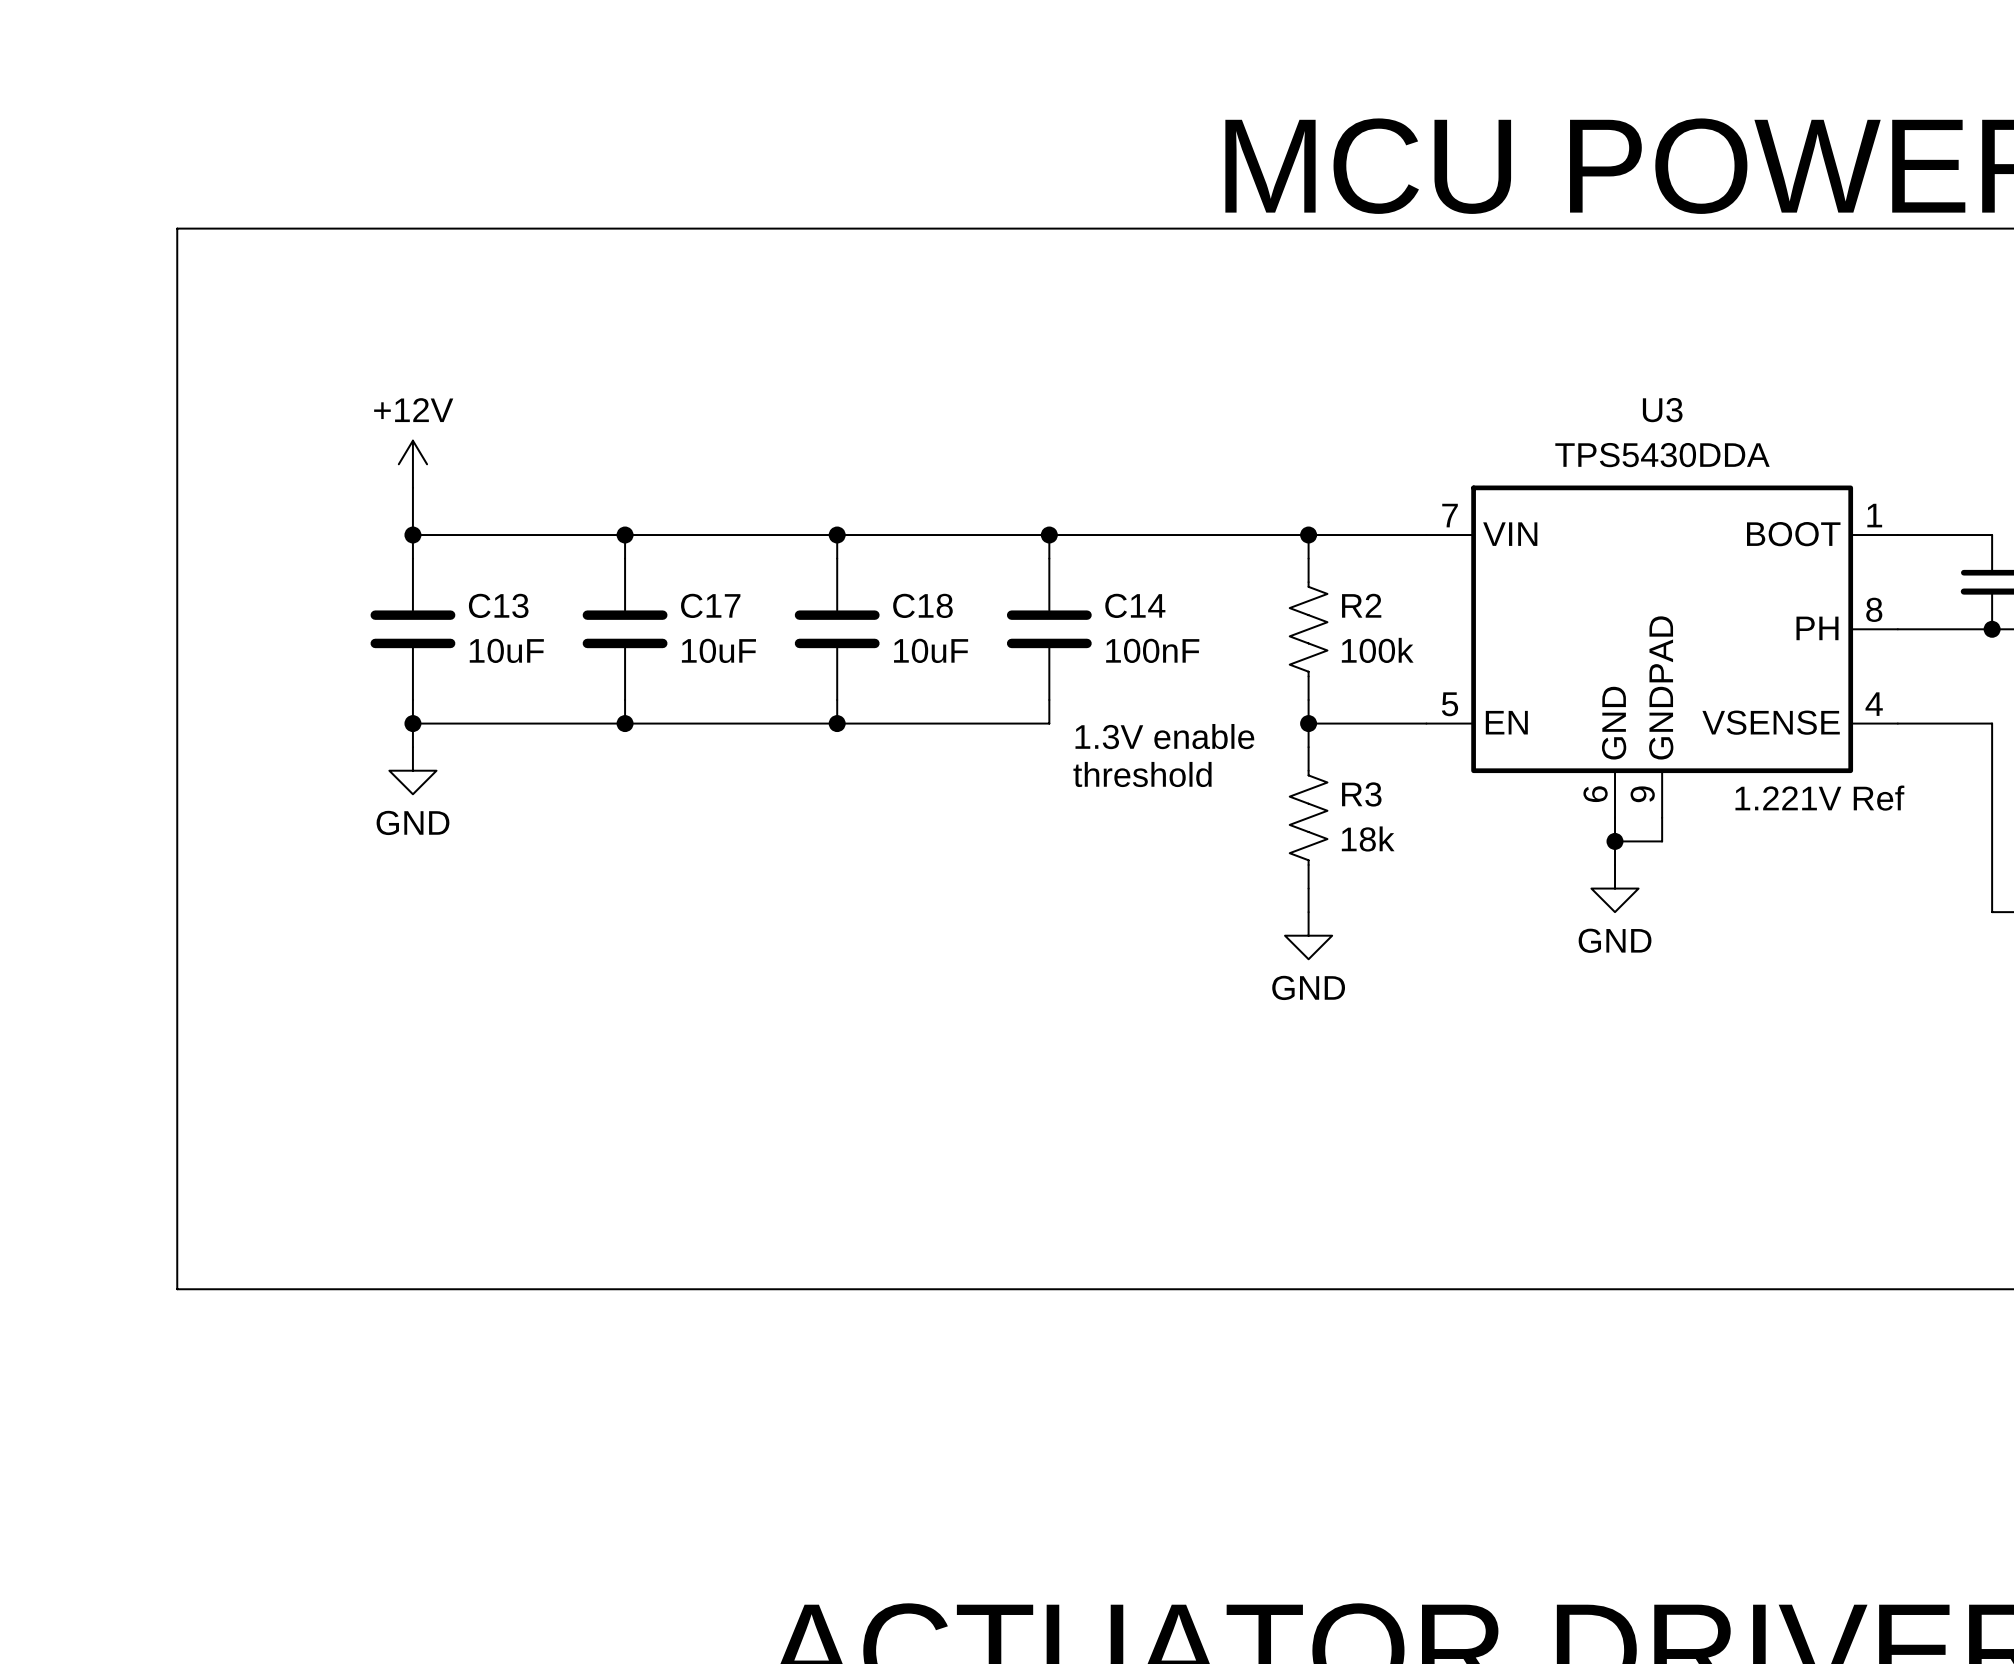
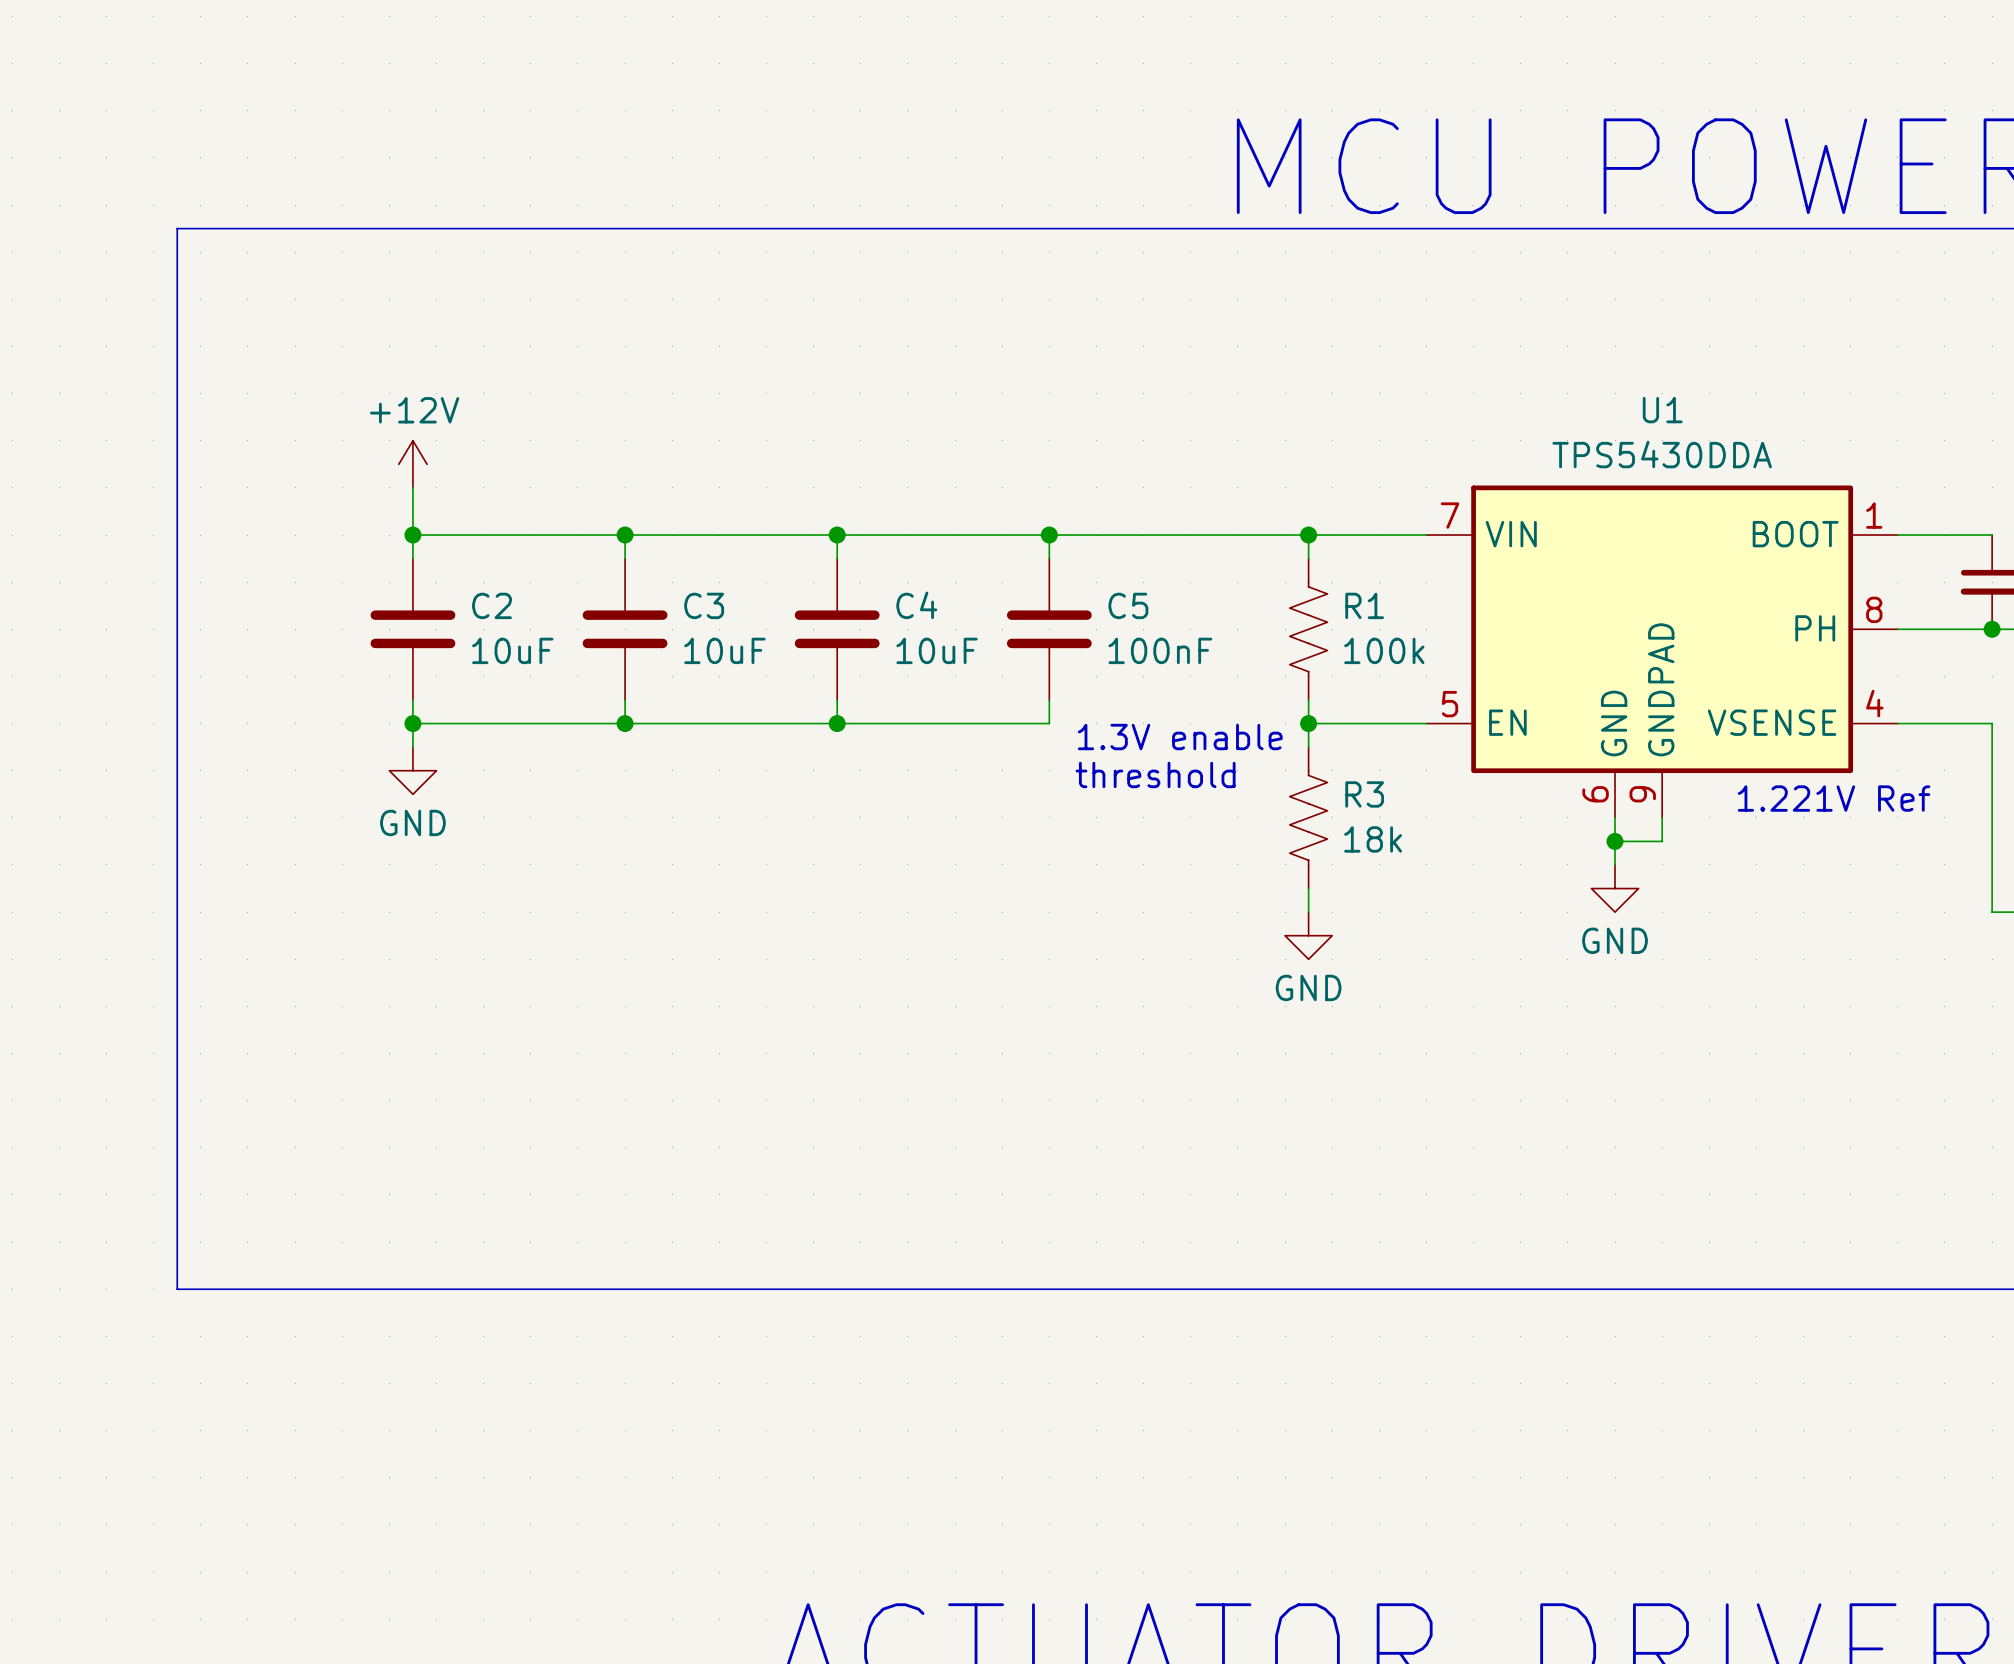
U3 name: U3 (1662, 410) -> U1 (1662, 410)
C13 name: C13 (498, 605) -> C2 (492, 605)
C17 name: C17 (710, 605) -> C3 (704, 605)
C18 name: C18 (922, 605) -> C4 (916, 605)
C14 name: C14 (1135, 605) -> C5 (1128, 605)
R2 name: R2 (1361, 605) -> R1 (1364, 605)

